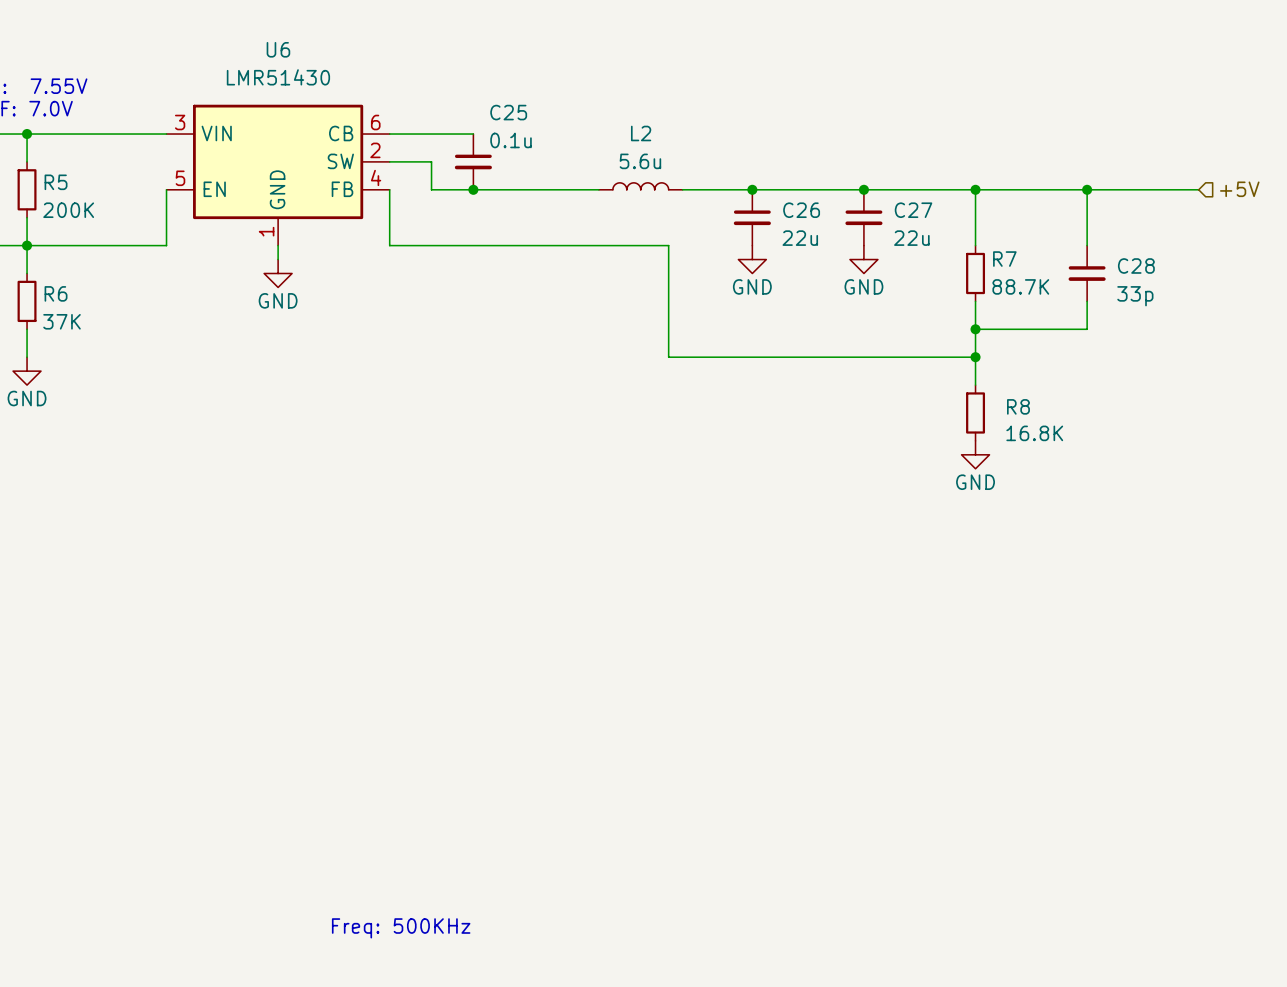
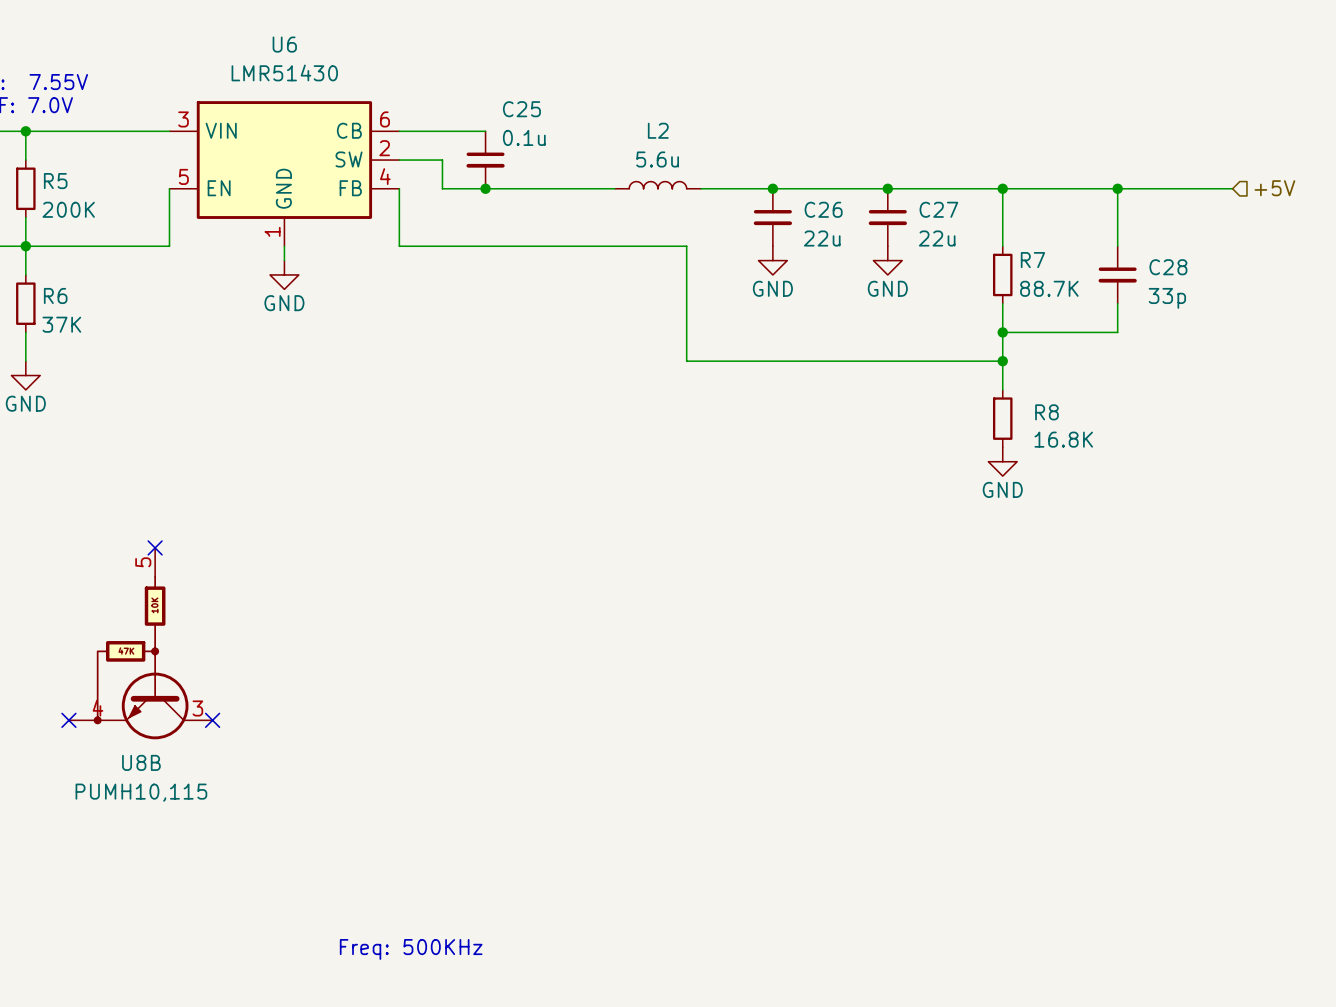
no-connect mark: none -> (155, 547)
U8B: none -> PUMH10,115 (140, 643)
no-connect mark: none -> (68, 720)
no-connect mark: none -> (212, 720)

